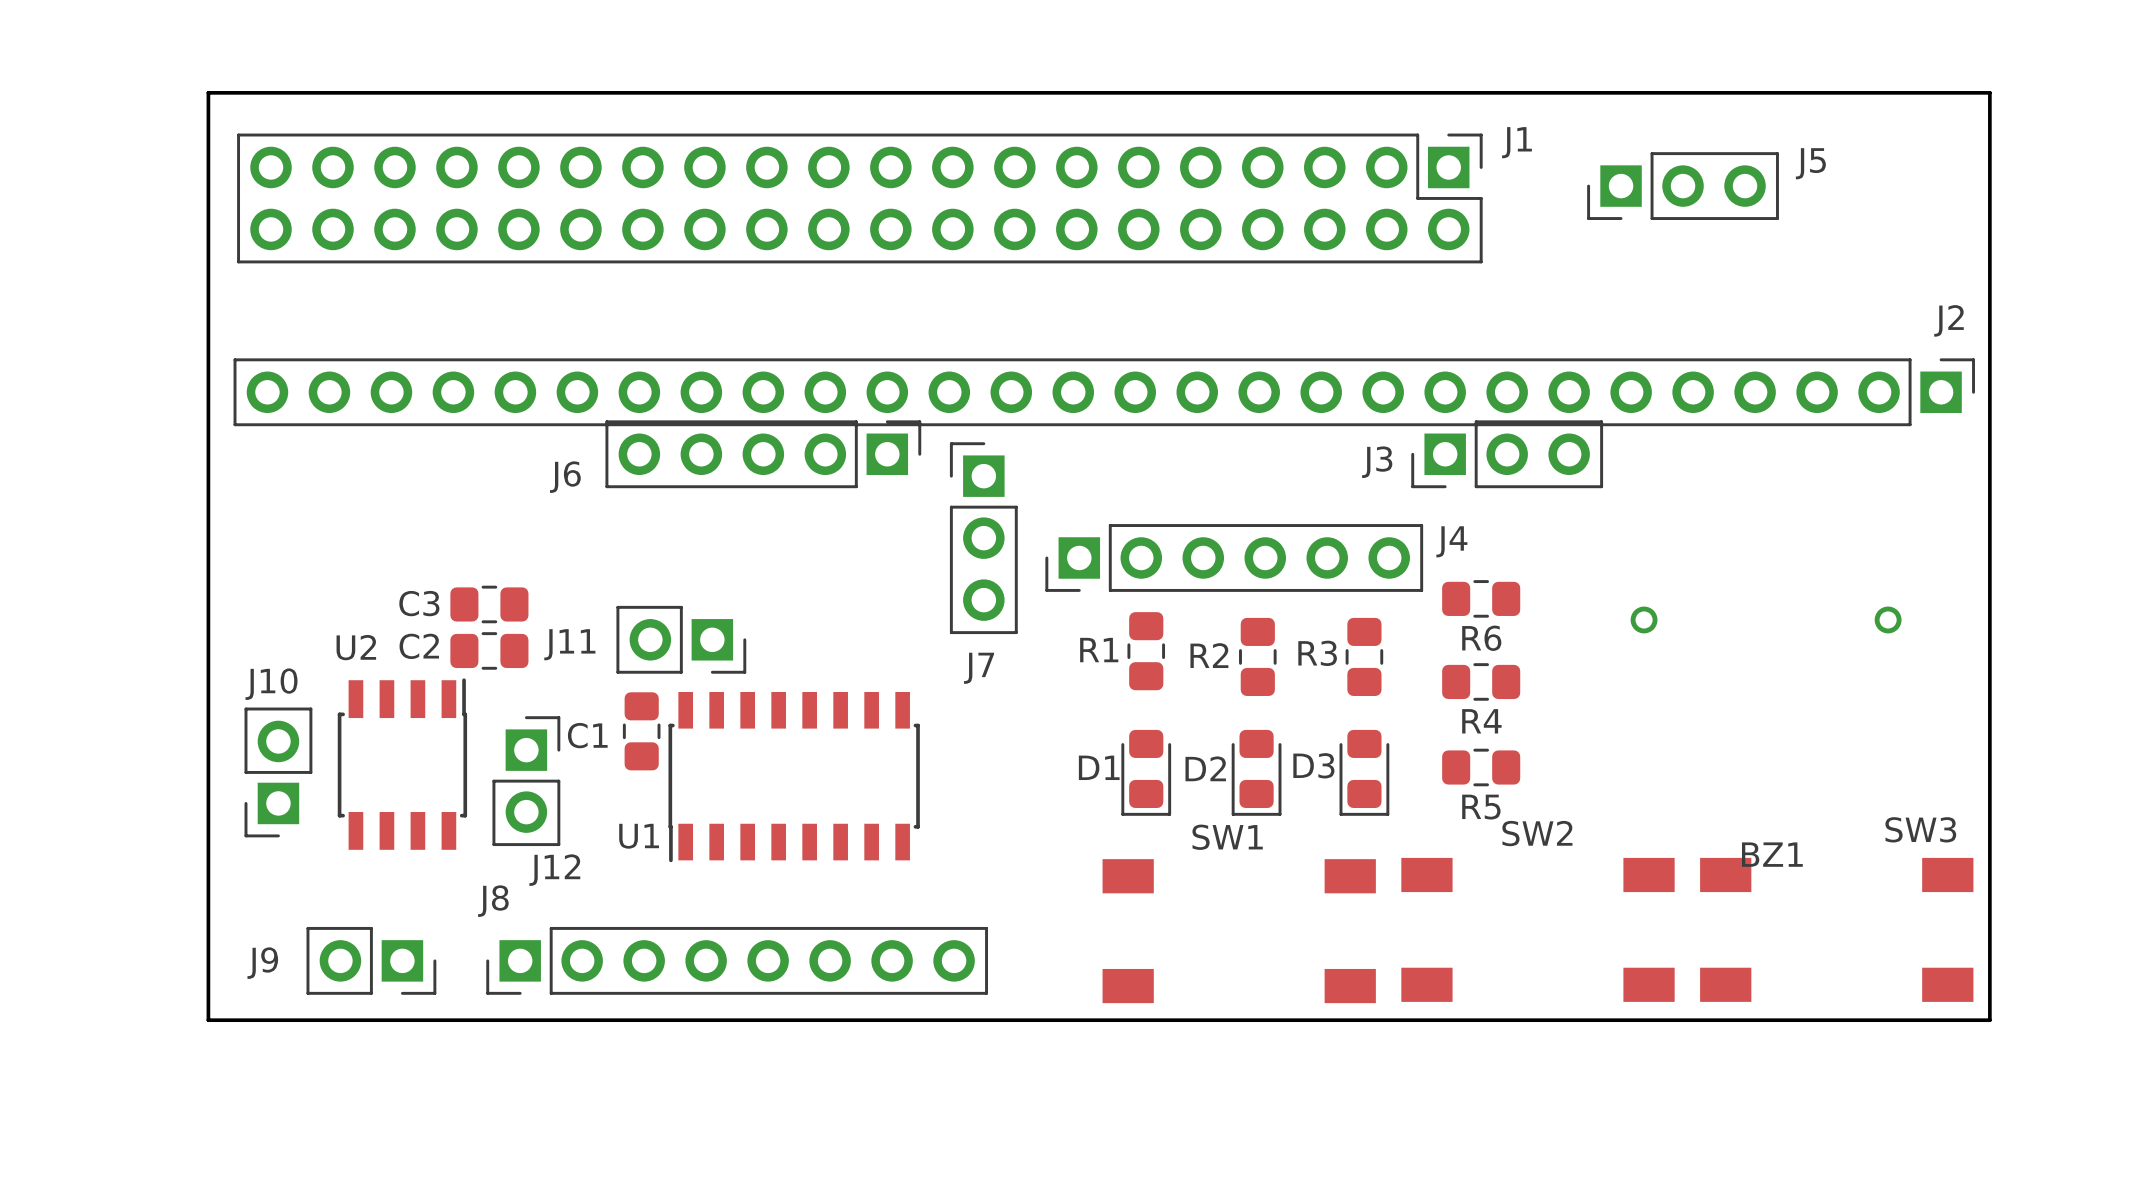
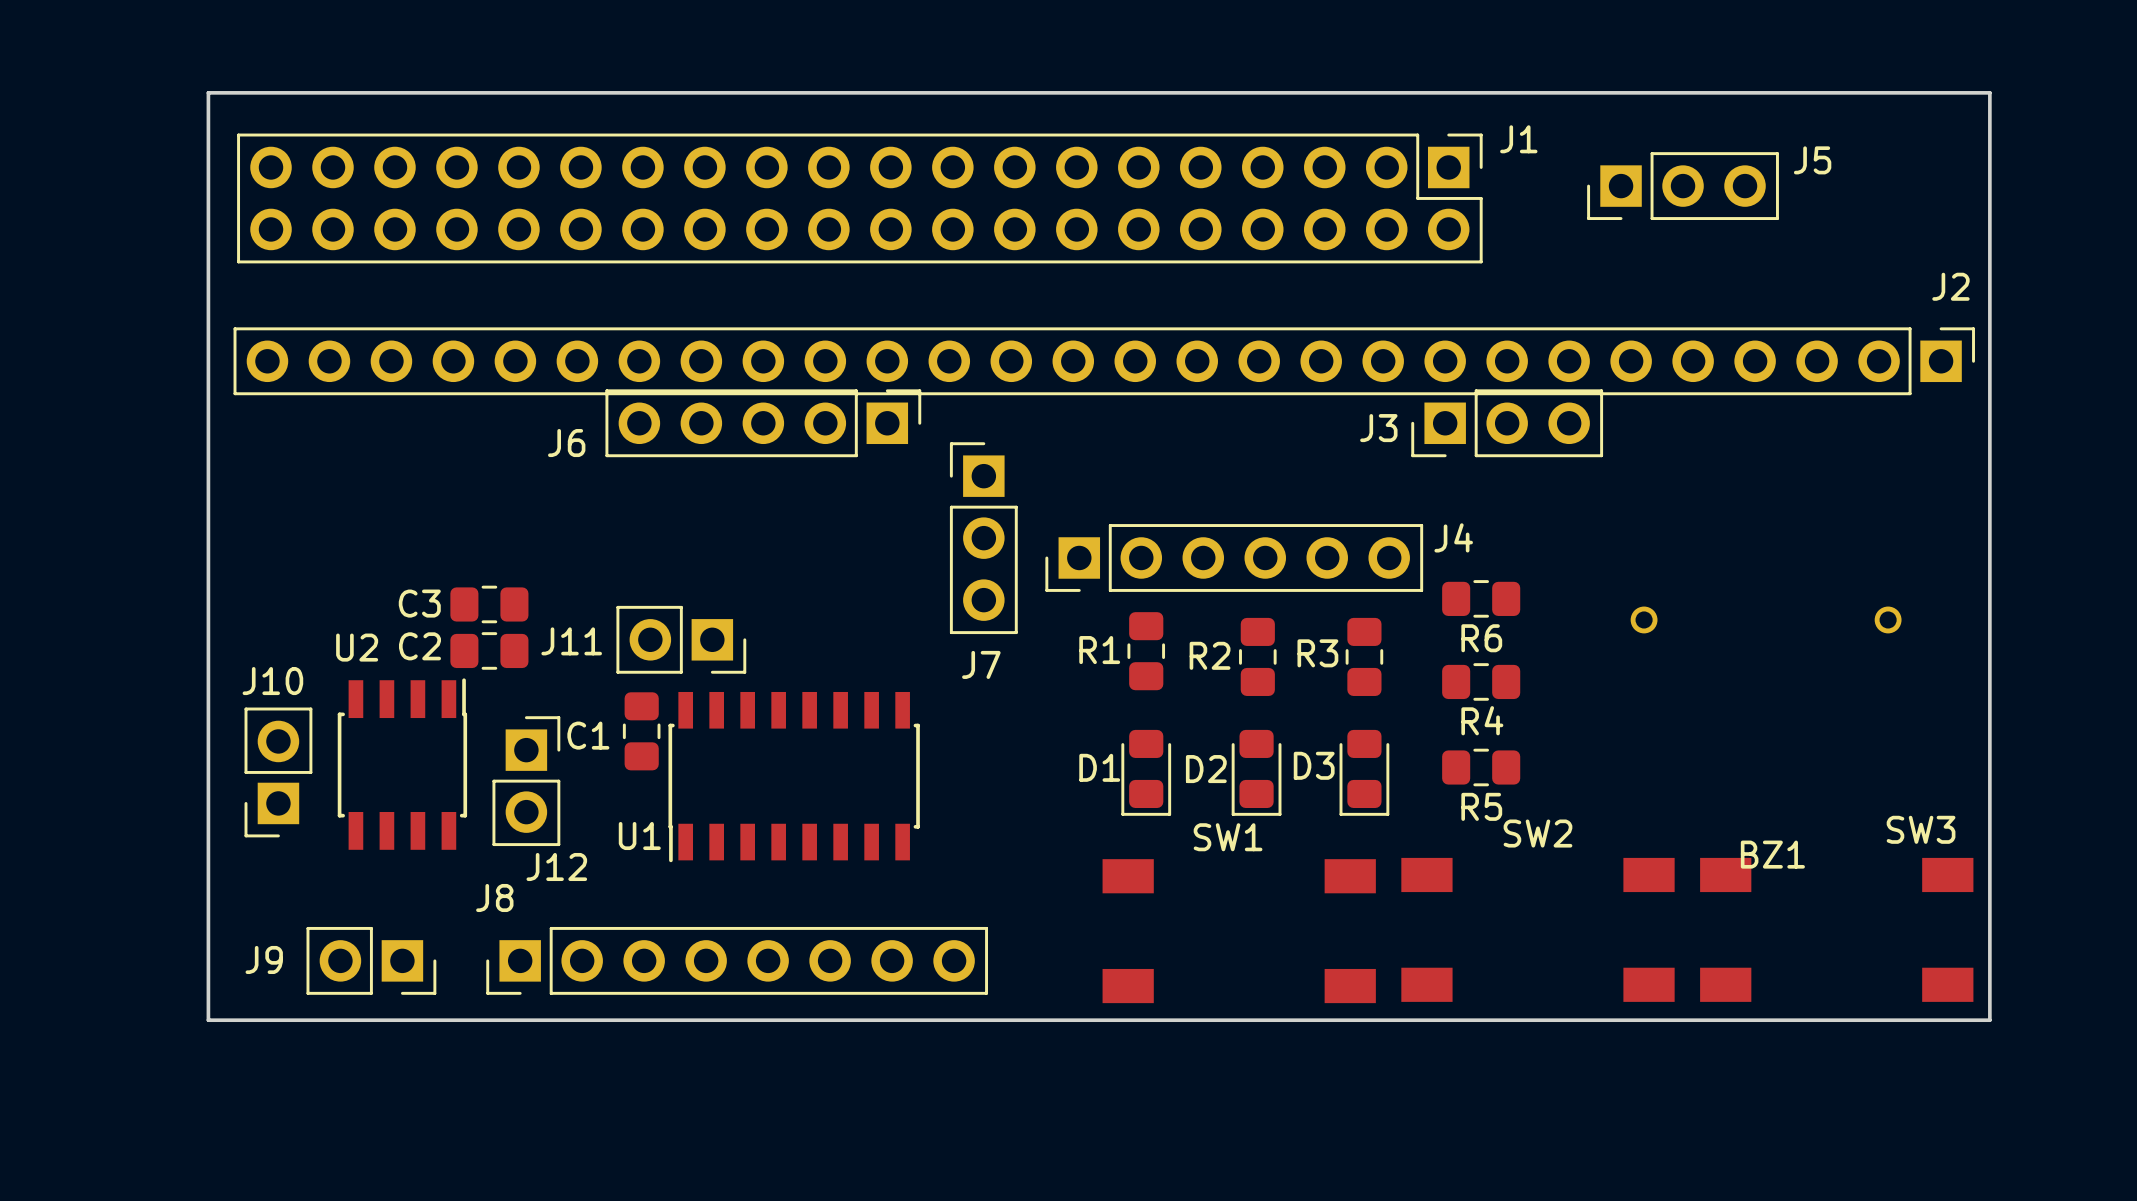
J2 position: (1104, 392) -> (1104, 361)
J6 position: (763, 454) -> (763, 423)
J3 position: (1507, 454) -> (1507, 423)

